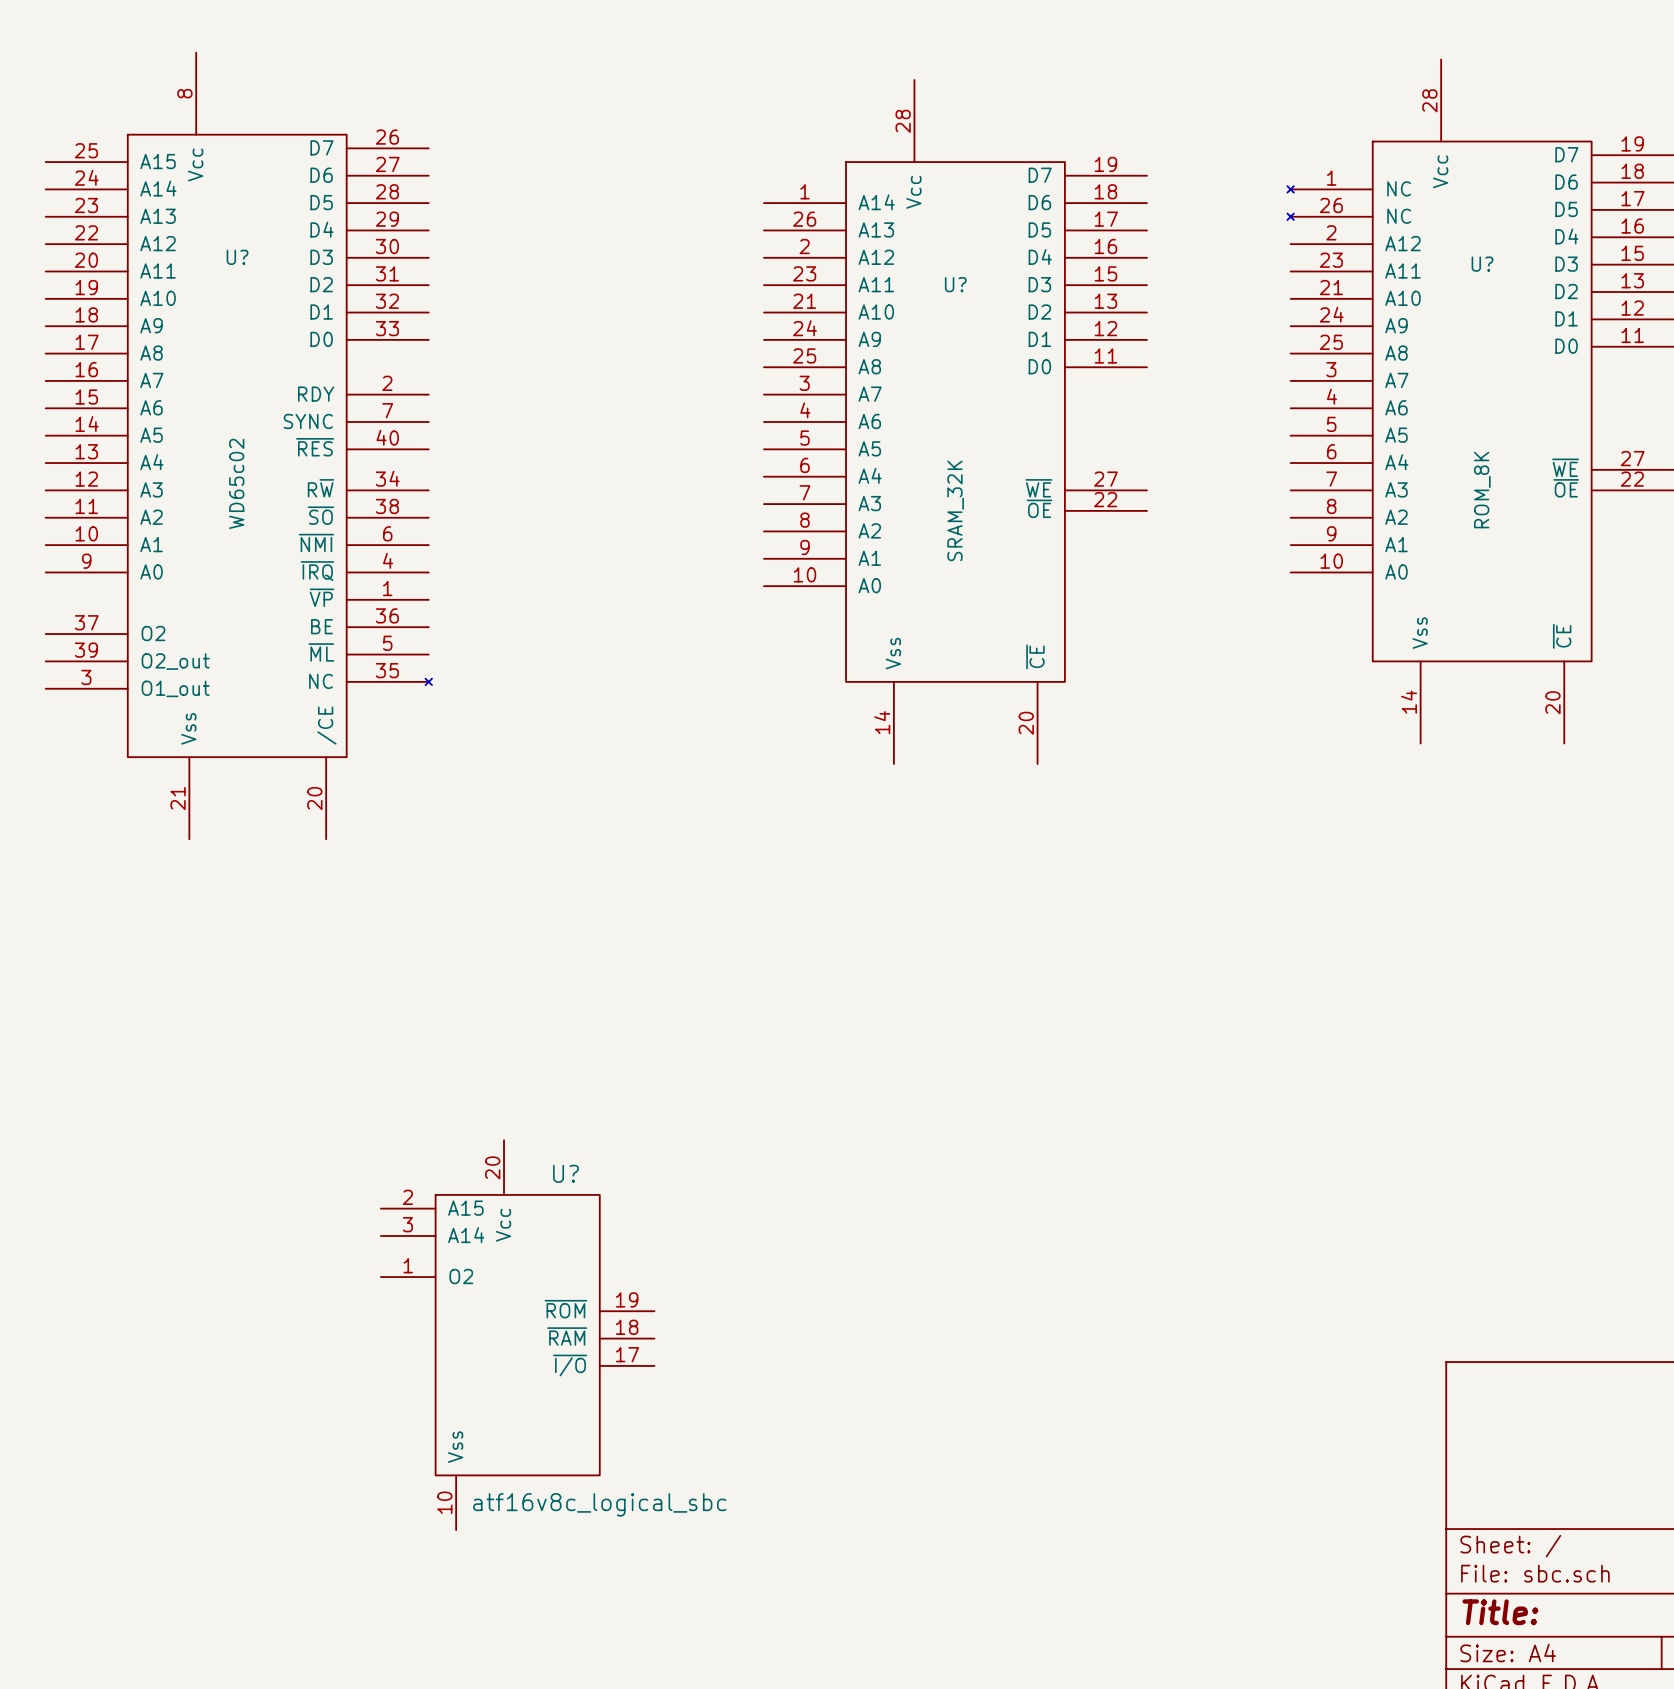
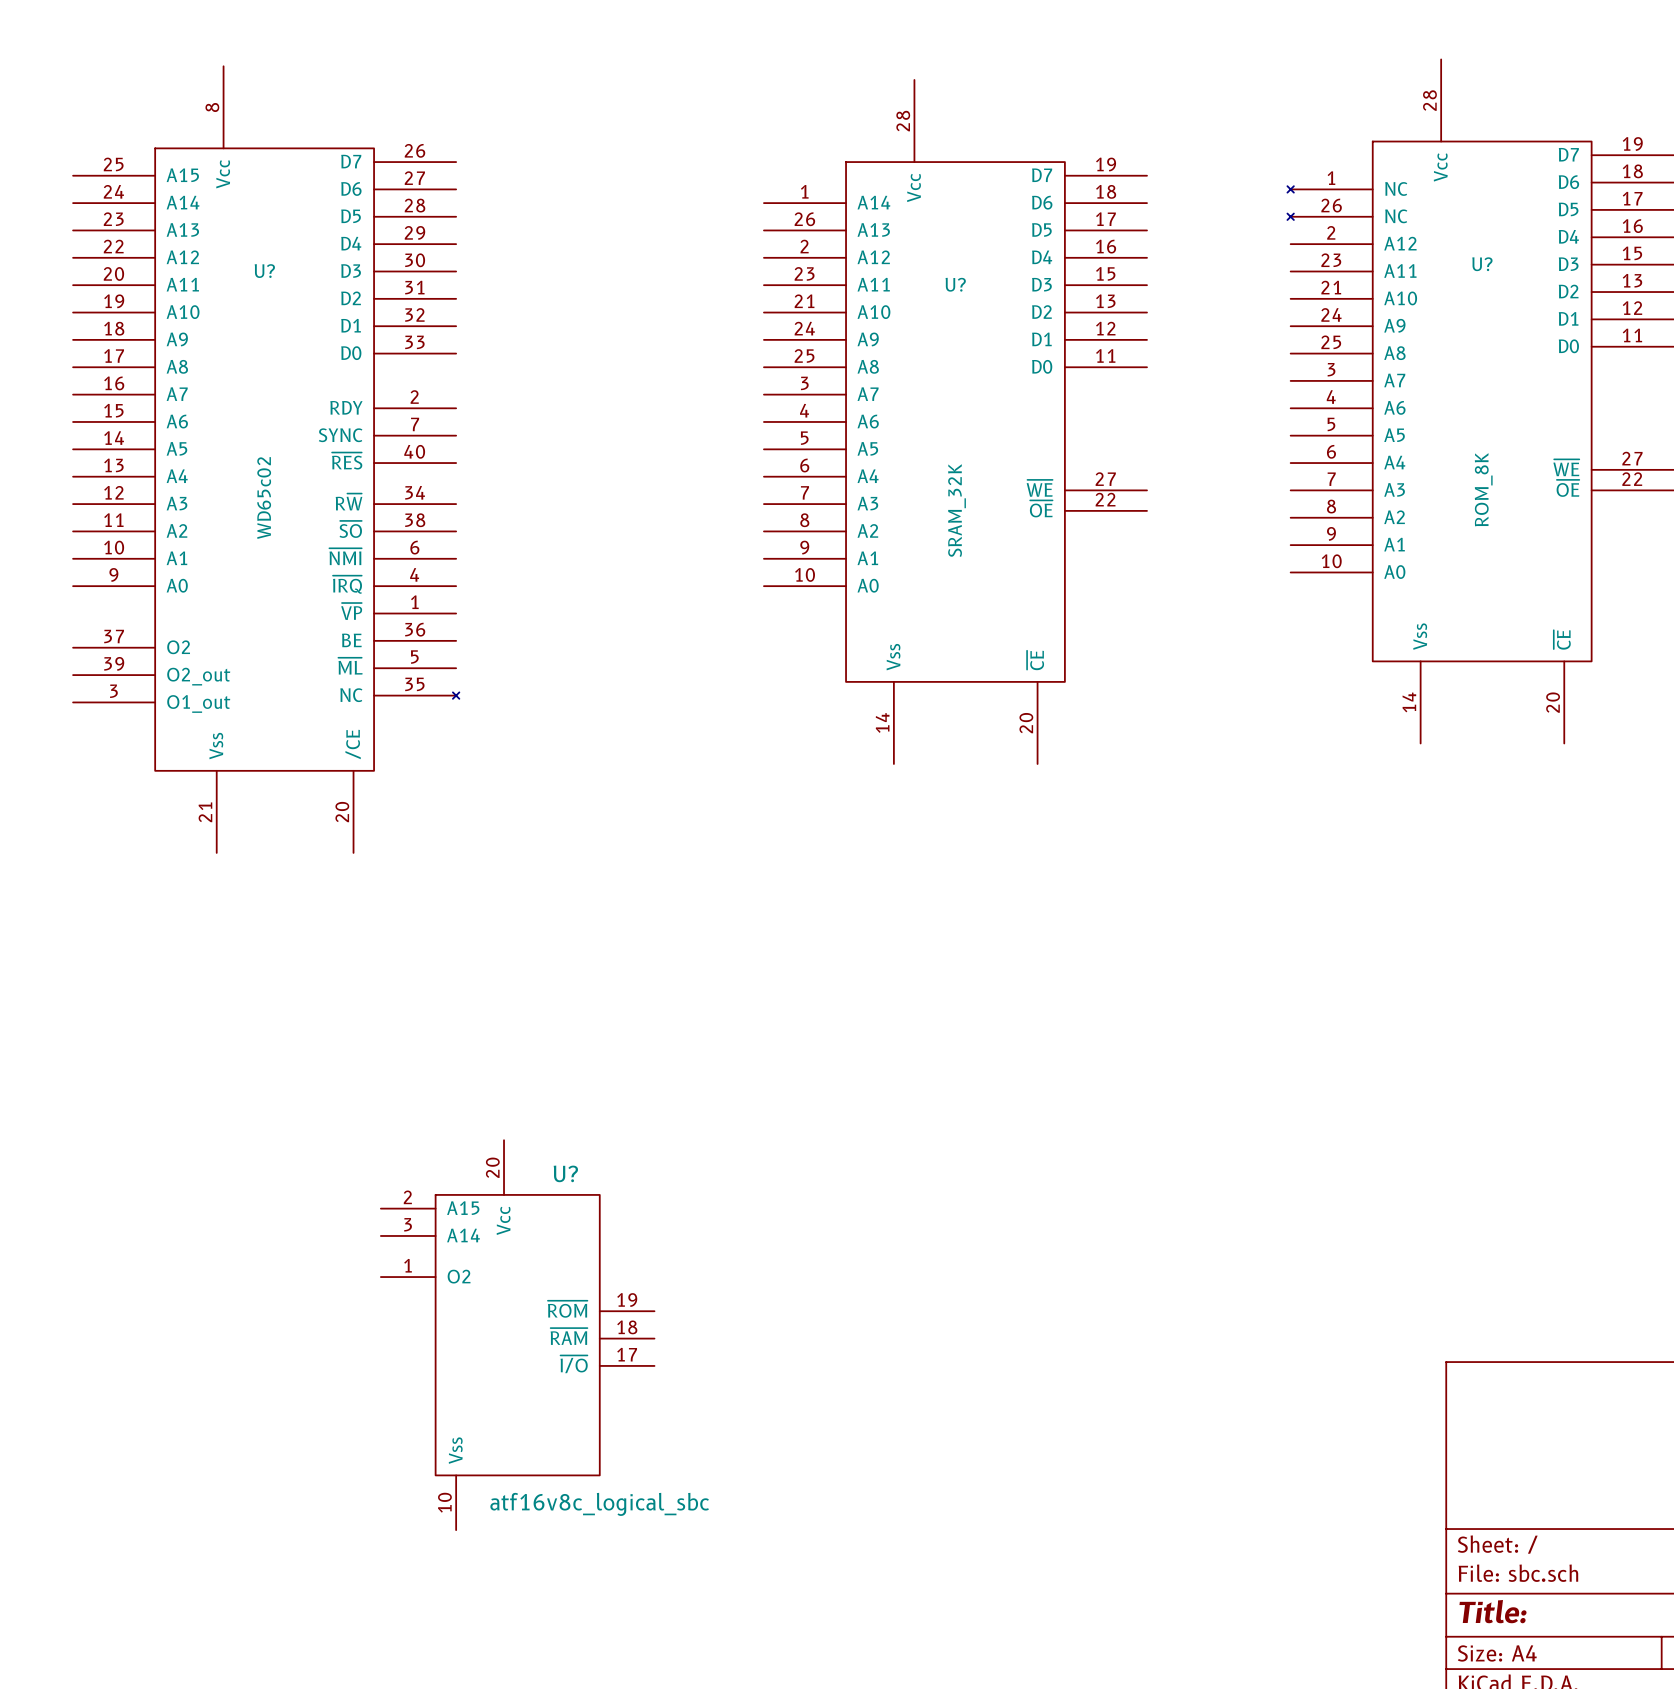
U? position: (238, 445) -> (266, 459)

